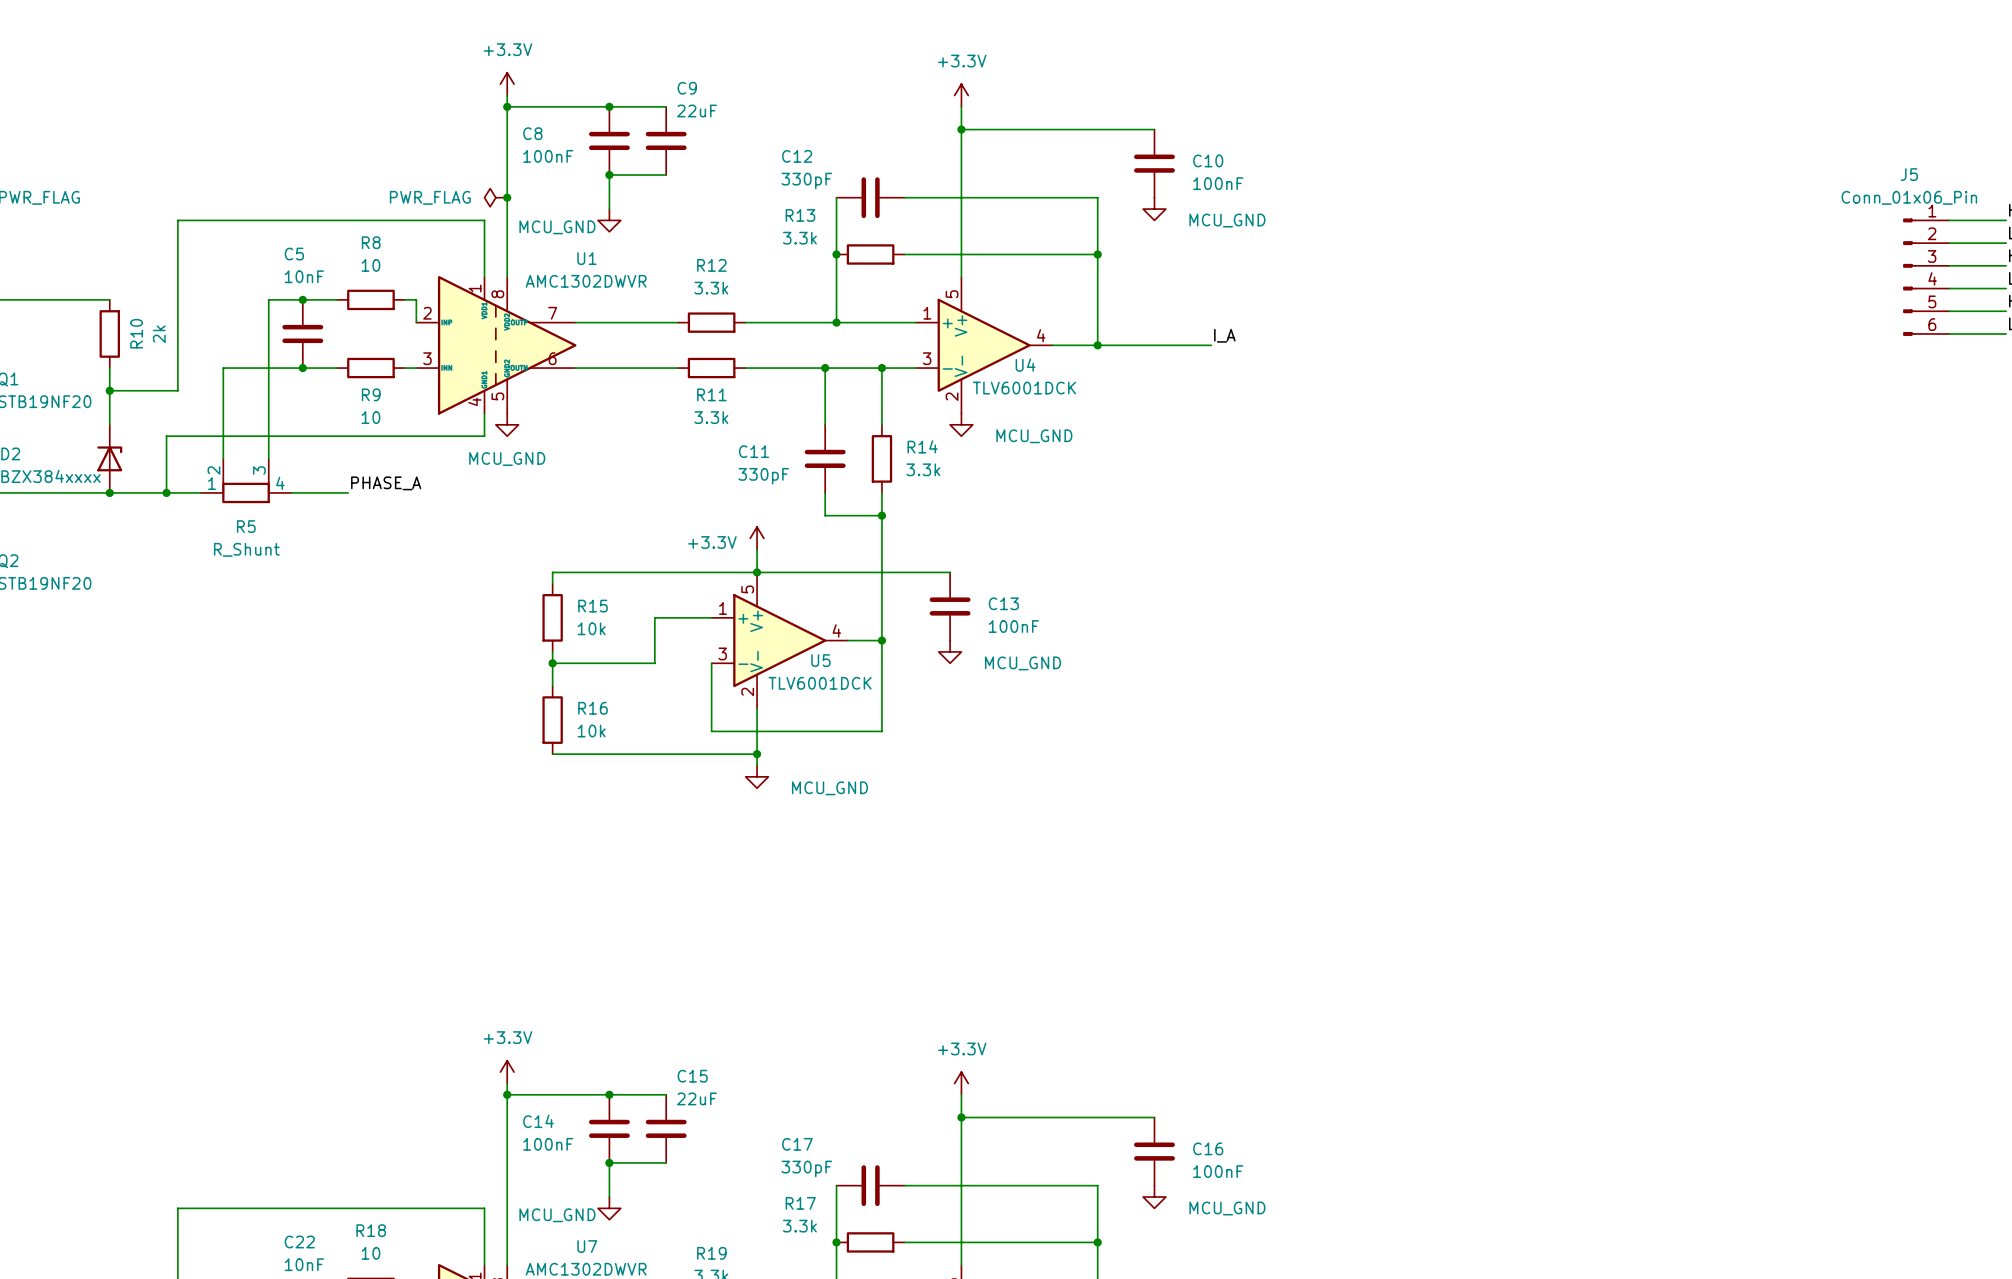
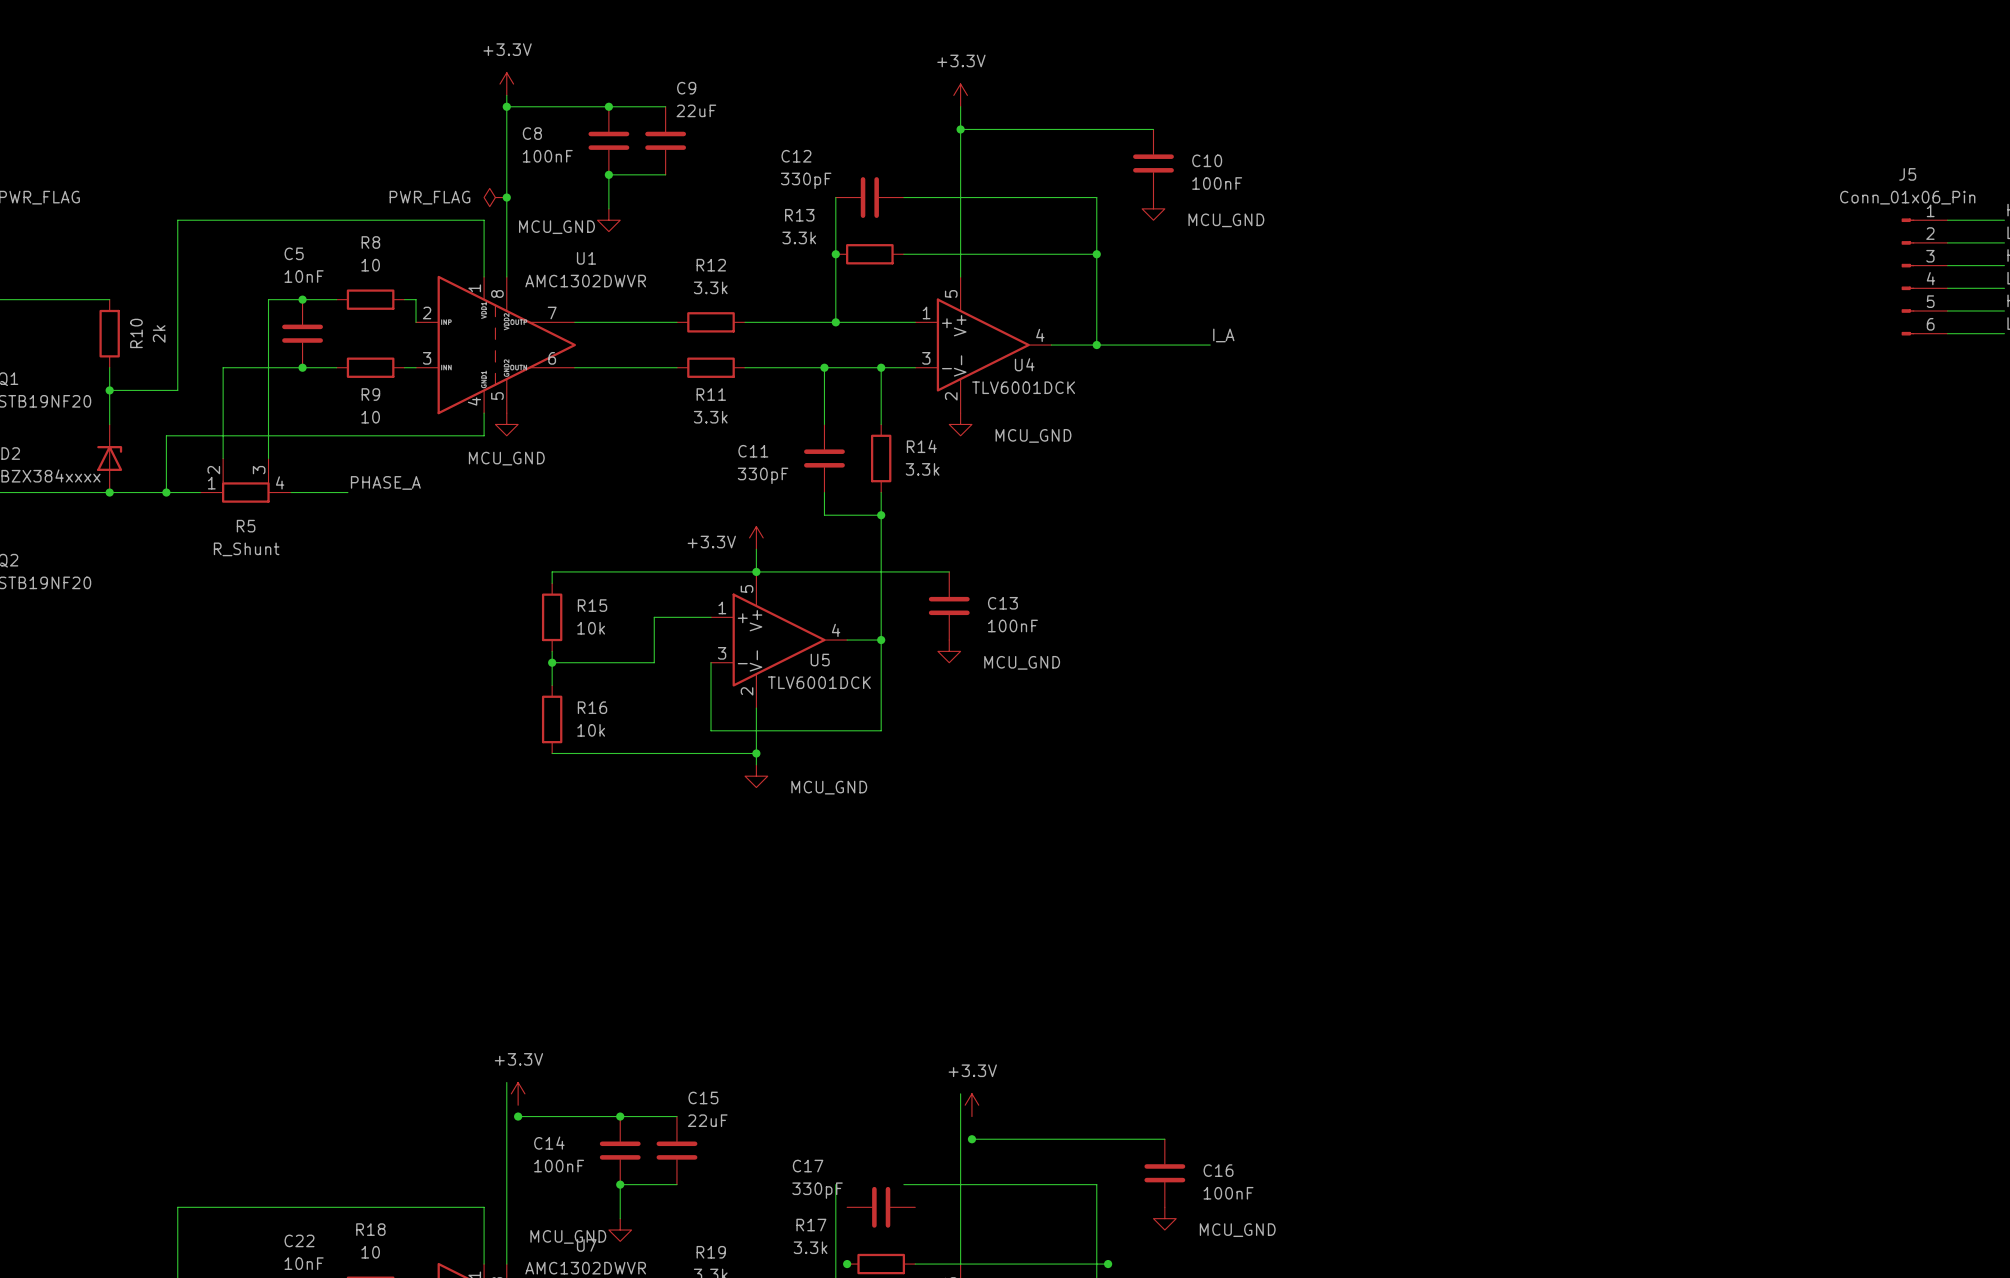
power symbol position: +3.3V (507, 1072) -> +3.3V (518, 1093)
power symbol position: +3.3V (961, 1083) -> +3.3V (971, 1105)
wire: (507, 1094) (666, 1094) -> (518, 1116) (676, 1116)
junction position: (507, 1094) -> (518, 1116)
junction: (609, 1094) -> none
junction: none -> (620, 1116)
wire: (961, 1117) (1154, 1117) -> (971, 1139) (1164, 1139)
junction position: (961, 1117) -> (971, 1139)
C14 position: (609, 1128) -> (620, 1150)
C15 position: (666, 1128) -> (676, 1150)
C16 position: (1154, 1151) -> (1164, 1173)
junction: (609, 1162) -> none
wire: (666, 1162) (609, 1162) (609, 1197) -> (676, 1184) (620, 1184) (620, 1218)
junction: none -> (620, 1184)
C17 position: (870, 1185) -> (881, 1207)
power symbol position: MCU_GND (1154, 1197) -> MCU_GND (1164, 1218)
power symbol position: MCU_GND (609, 1208) -> MCU_GND (620, 1230)
junction: (836, 1242) -> none
R17 position: (870, 1242) -> (881, 1264)
wire: (904, 1242) (1097, 1242) -> (915, 1264) (1108, 1264)
junction position: (1097, 1242) -> (1108, 1264)
junction: none -> (847, 1264)

